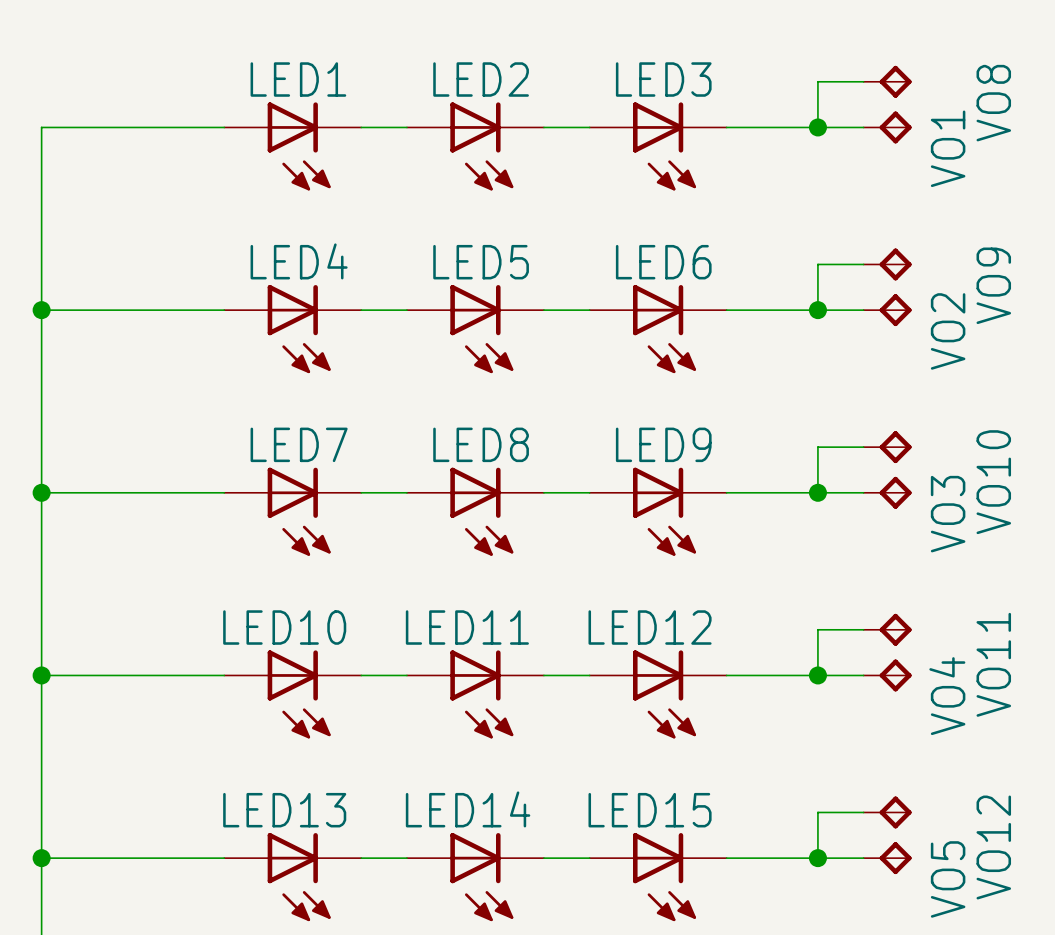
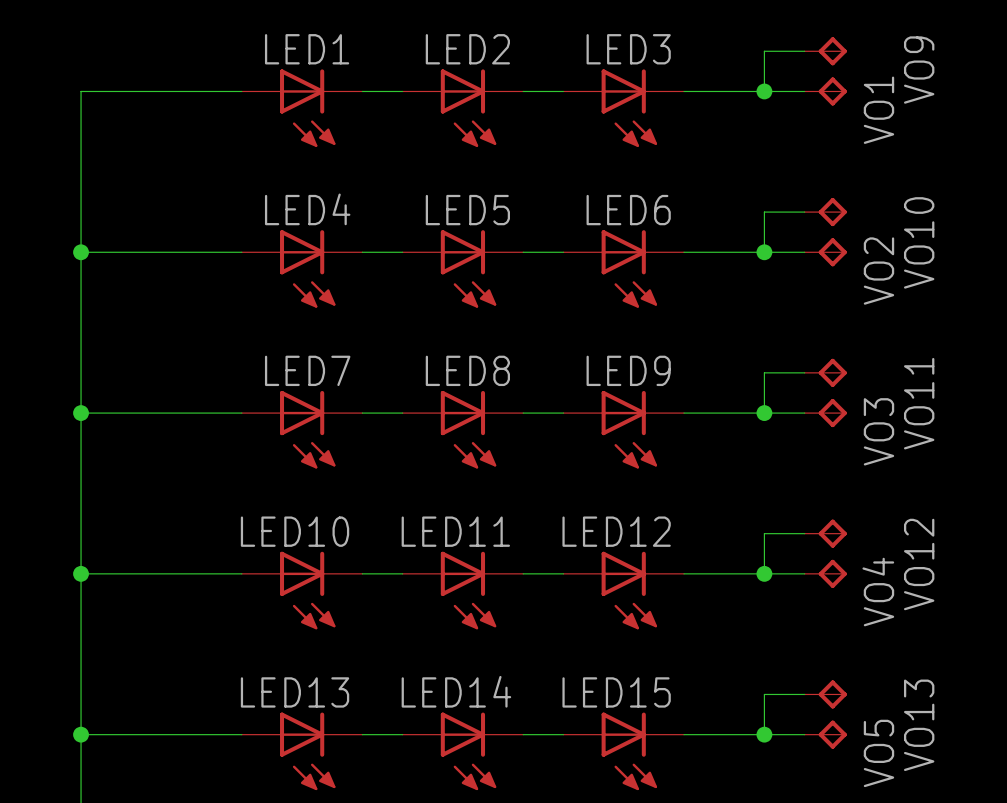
VO8 name: VO8 (993, 103) -> VO9 (919, 70)
VO9 name: VO9 (993, 285) -> VO10 (919, 242)
VO10 name: VO10 (993, 482) -> VO11 (919, 403)
VO11 name: VO11 (993, 664) -> VO12 (919, 564)
VO12 name: VO12 (993, 847) -> VO13 (919, 725)

